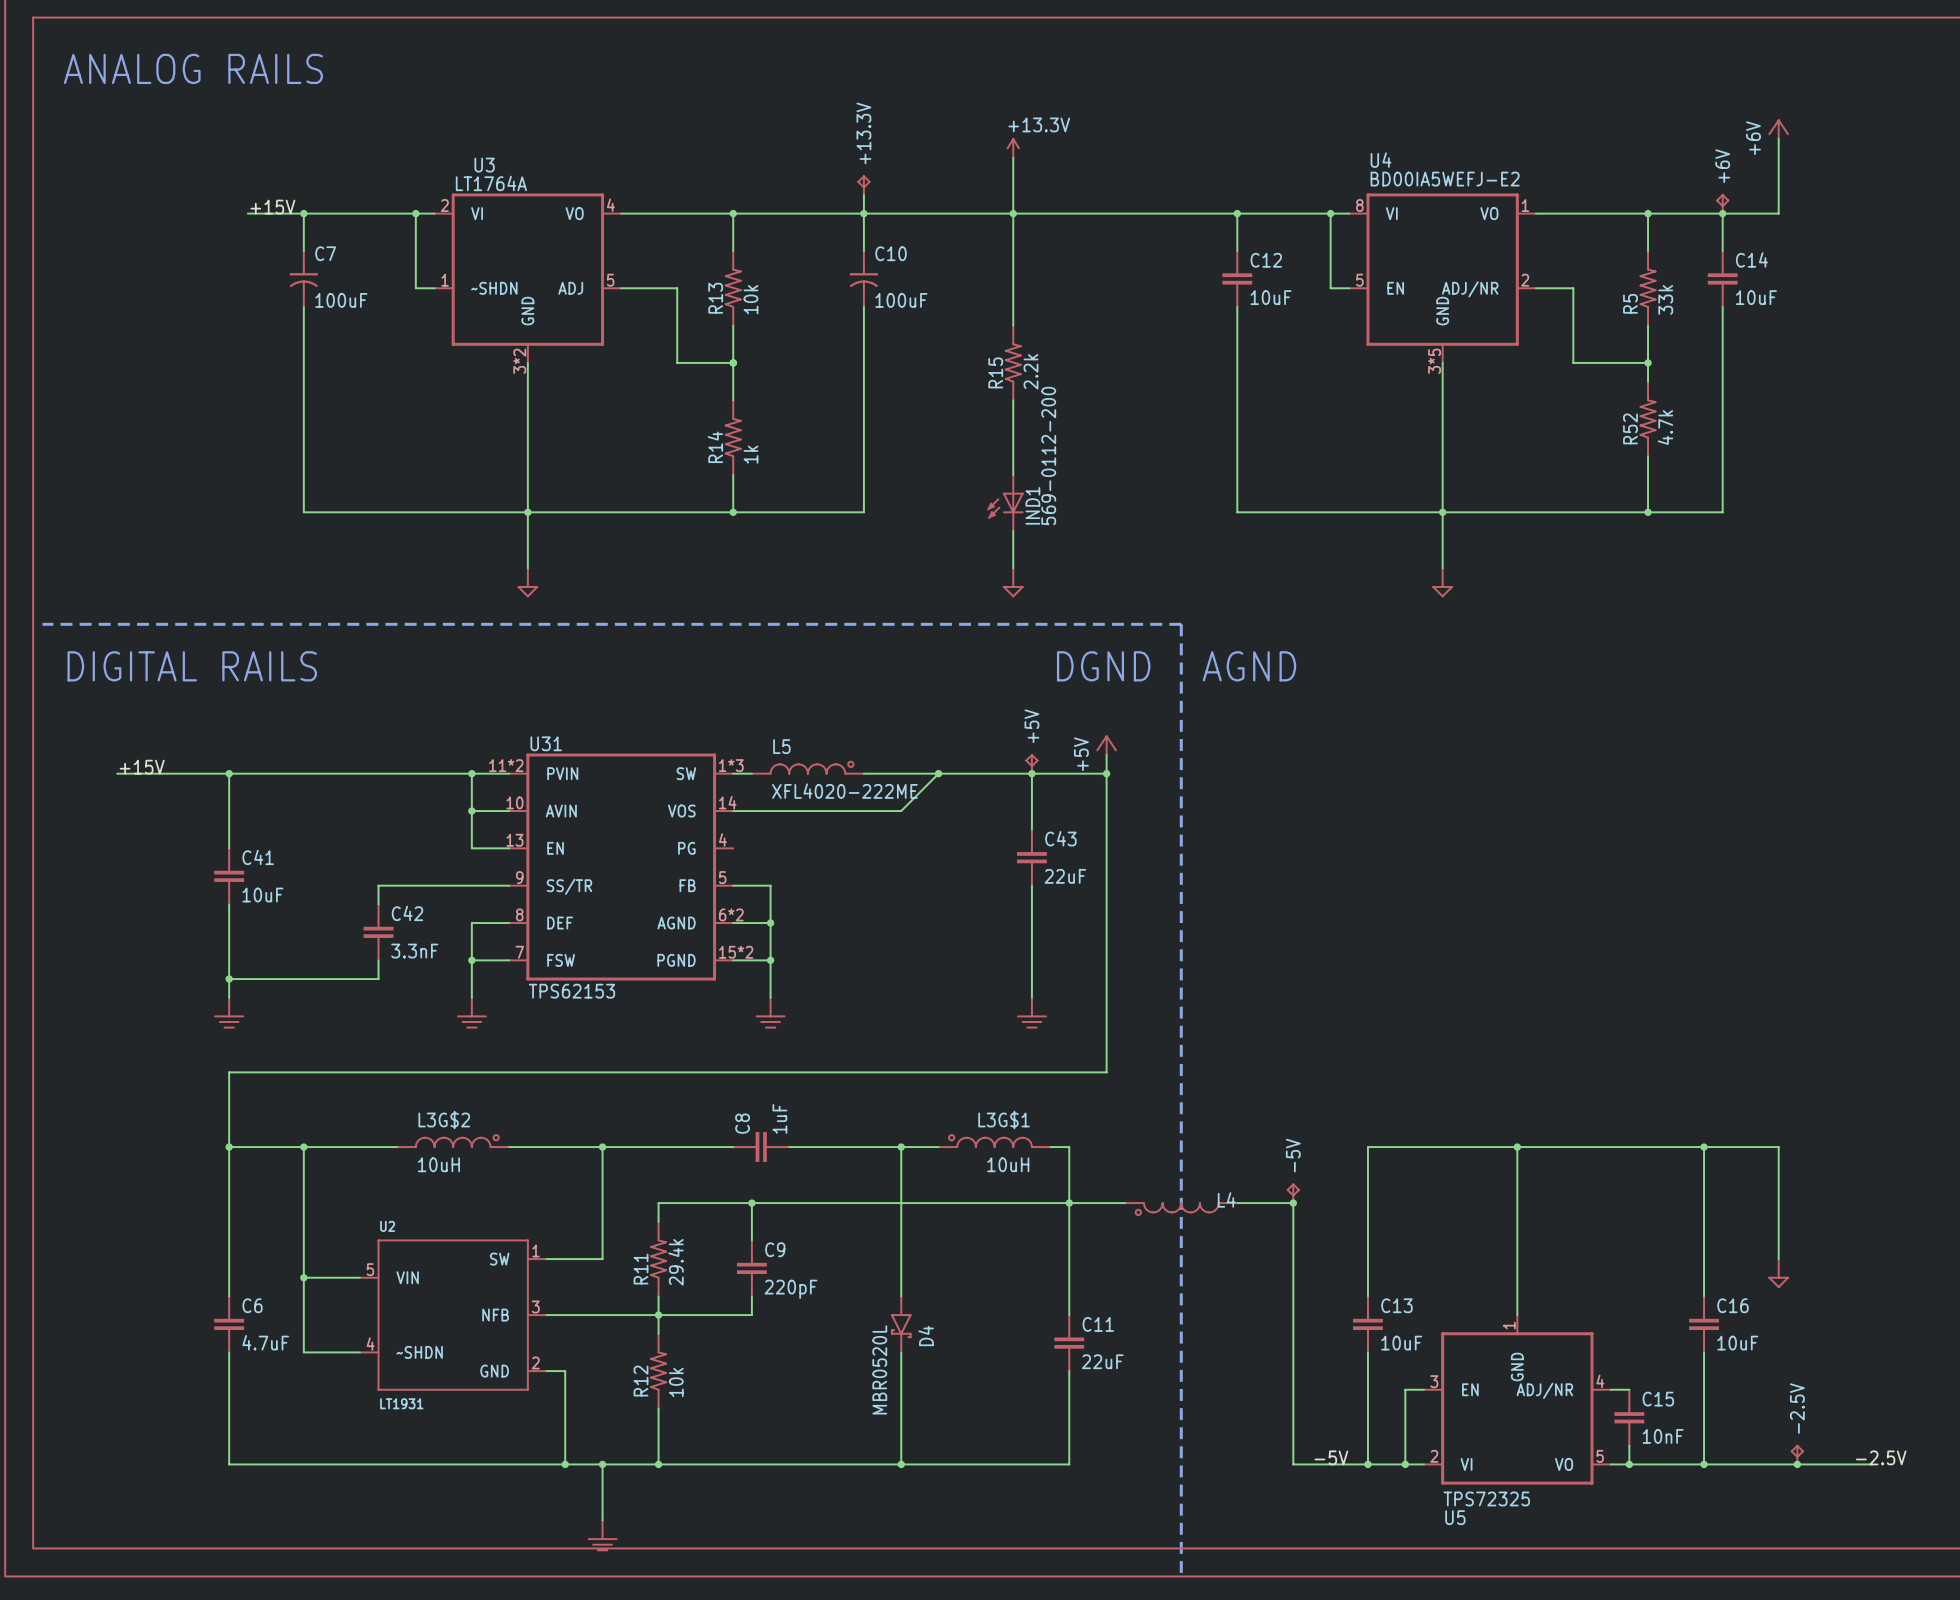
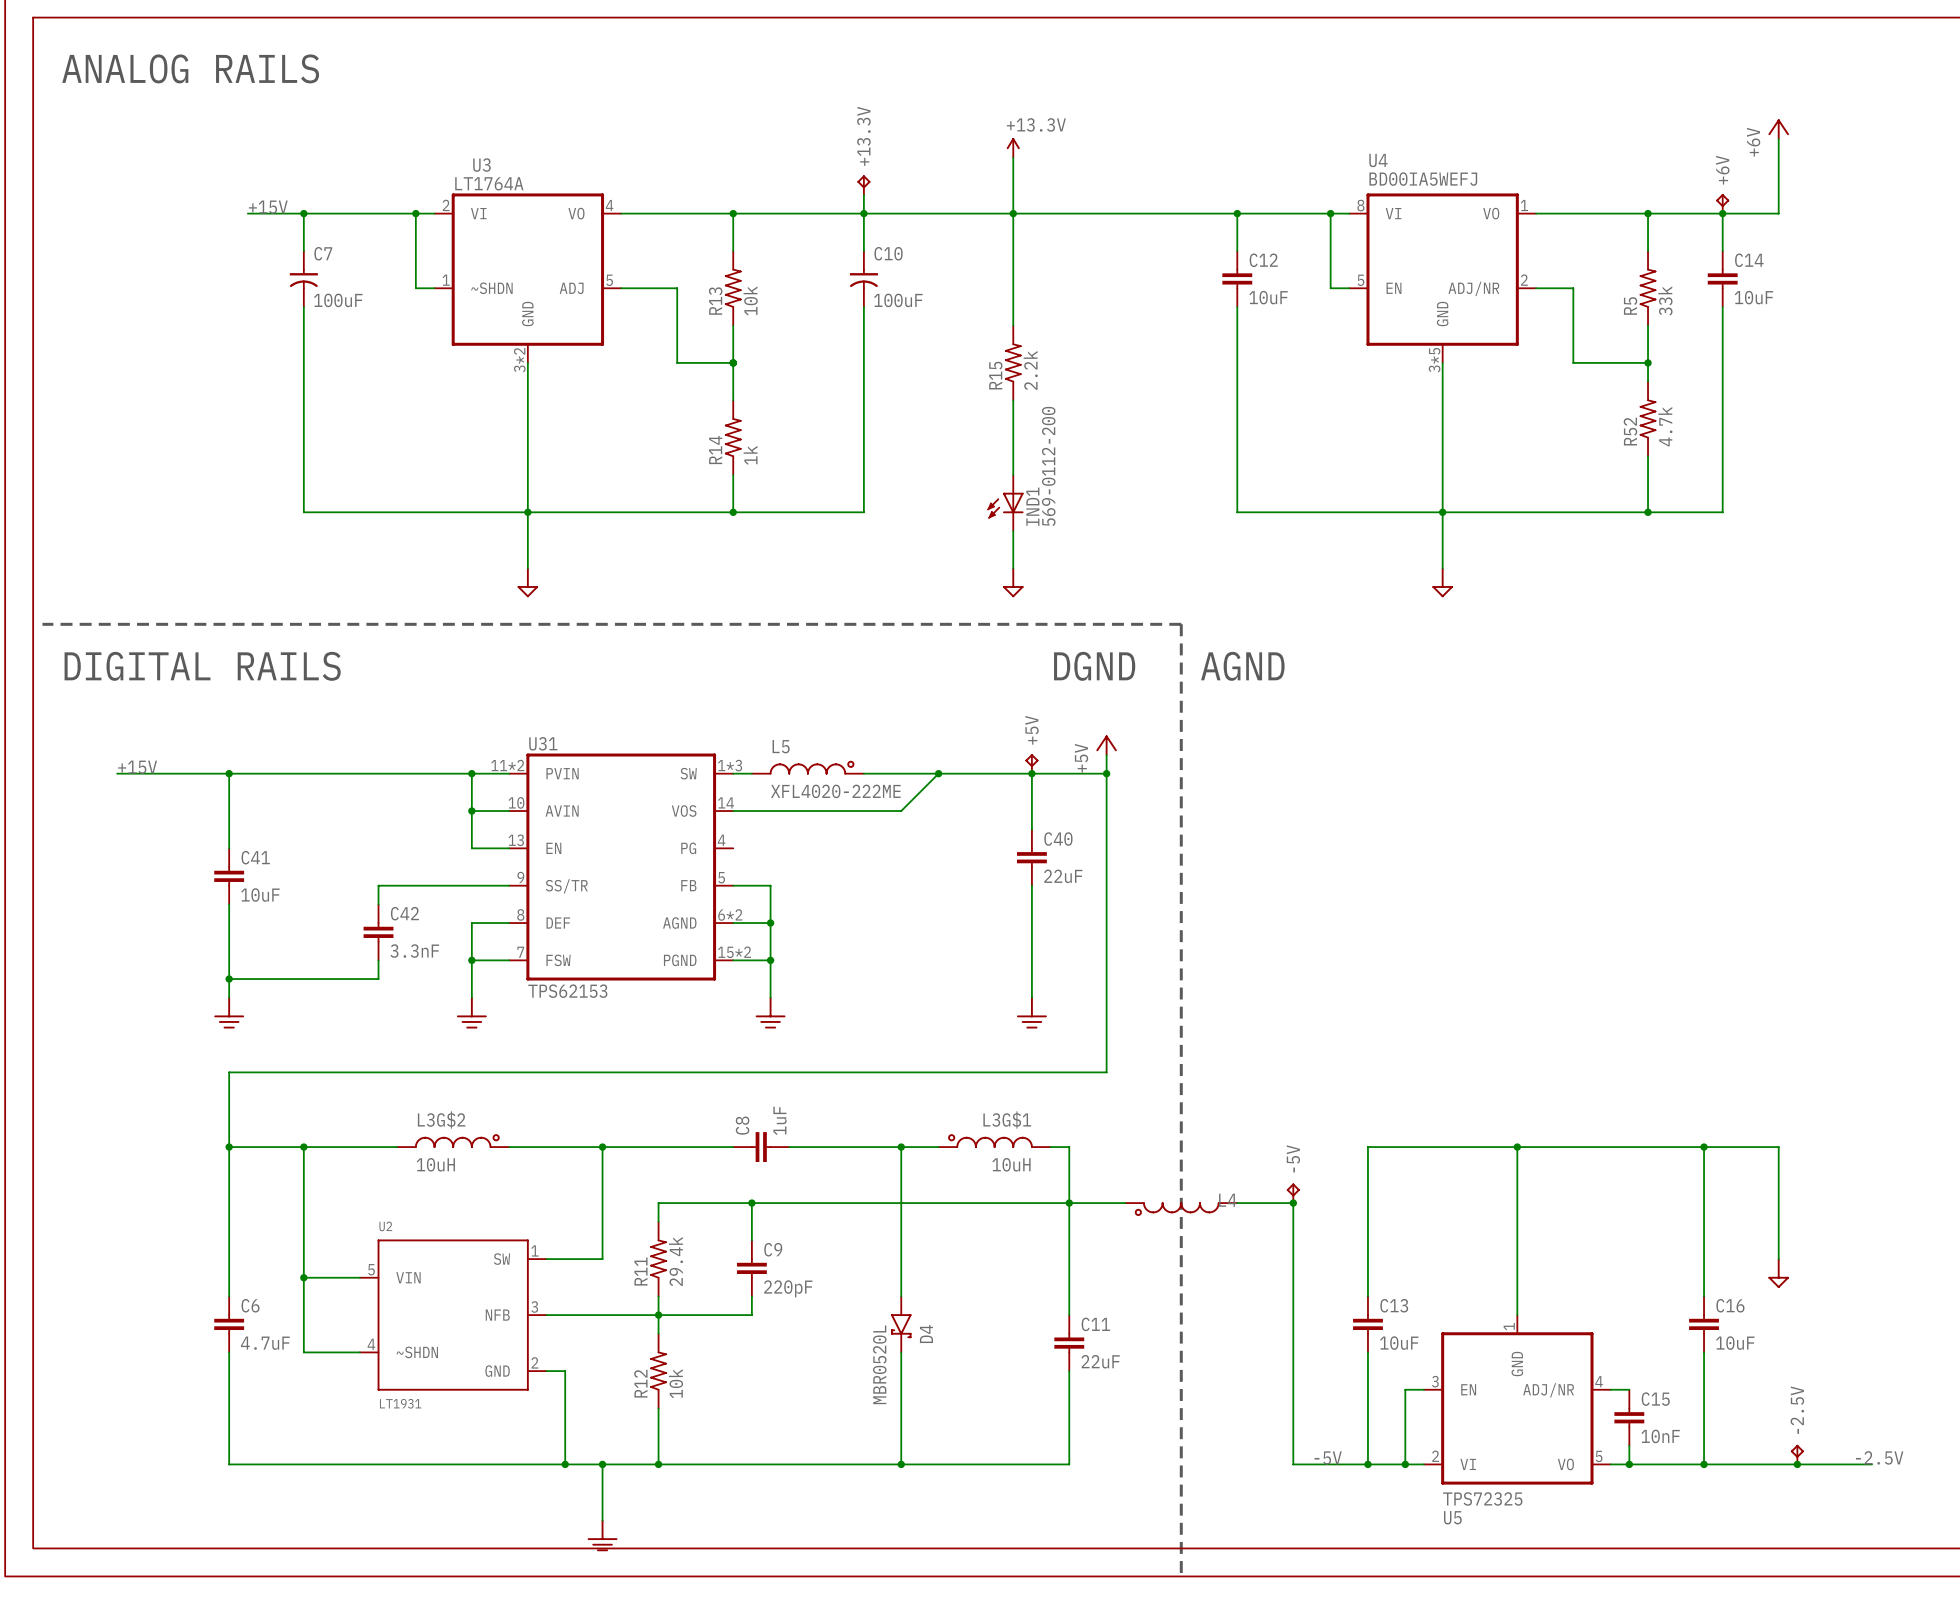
U4 value: BD00IA5WEFJ-E2 (1445, 179) -> BD00IA5WEFJ (1423, 179)
C43 name: C43 (1060, 838) -> C40 (1058, 839)

